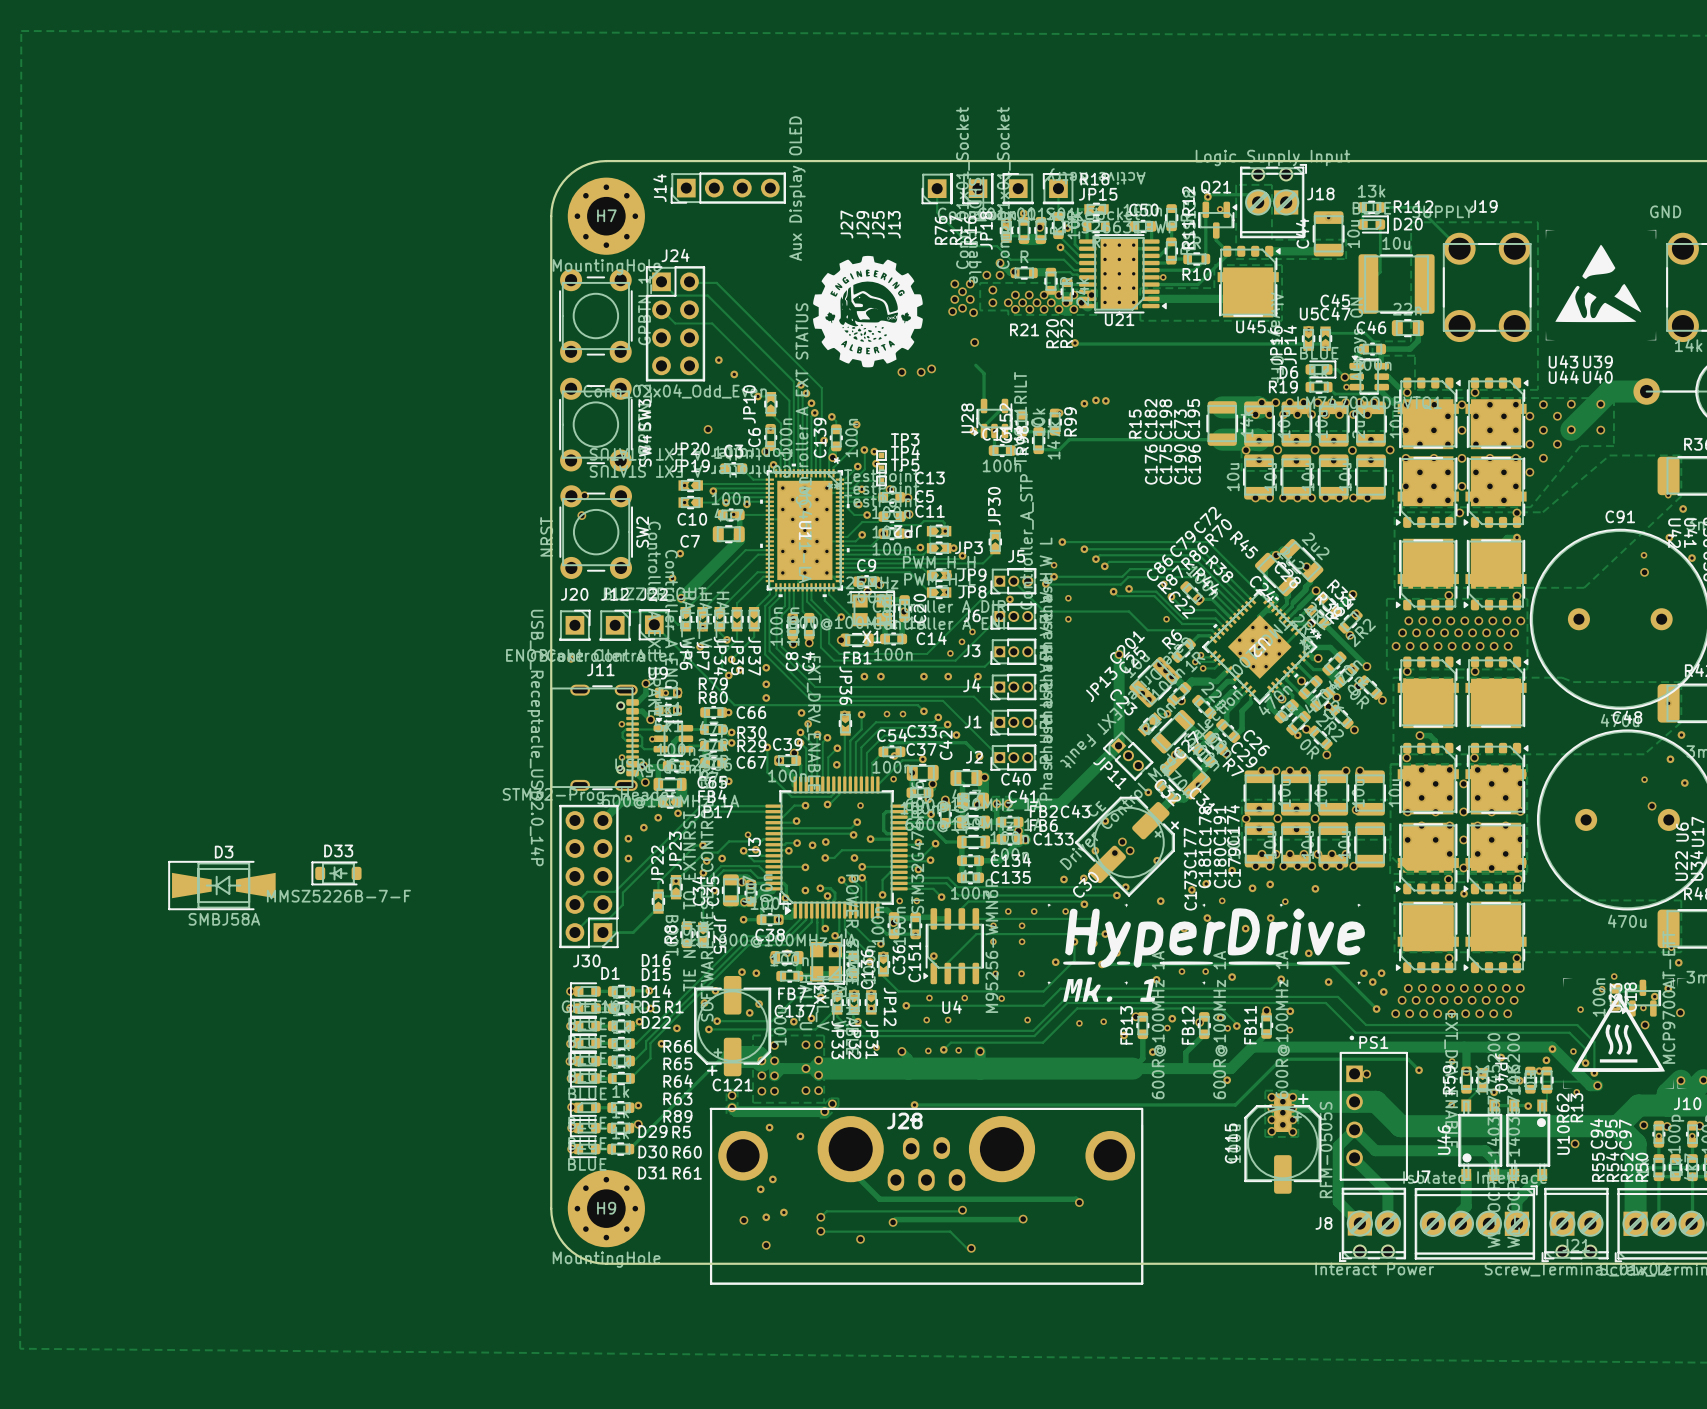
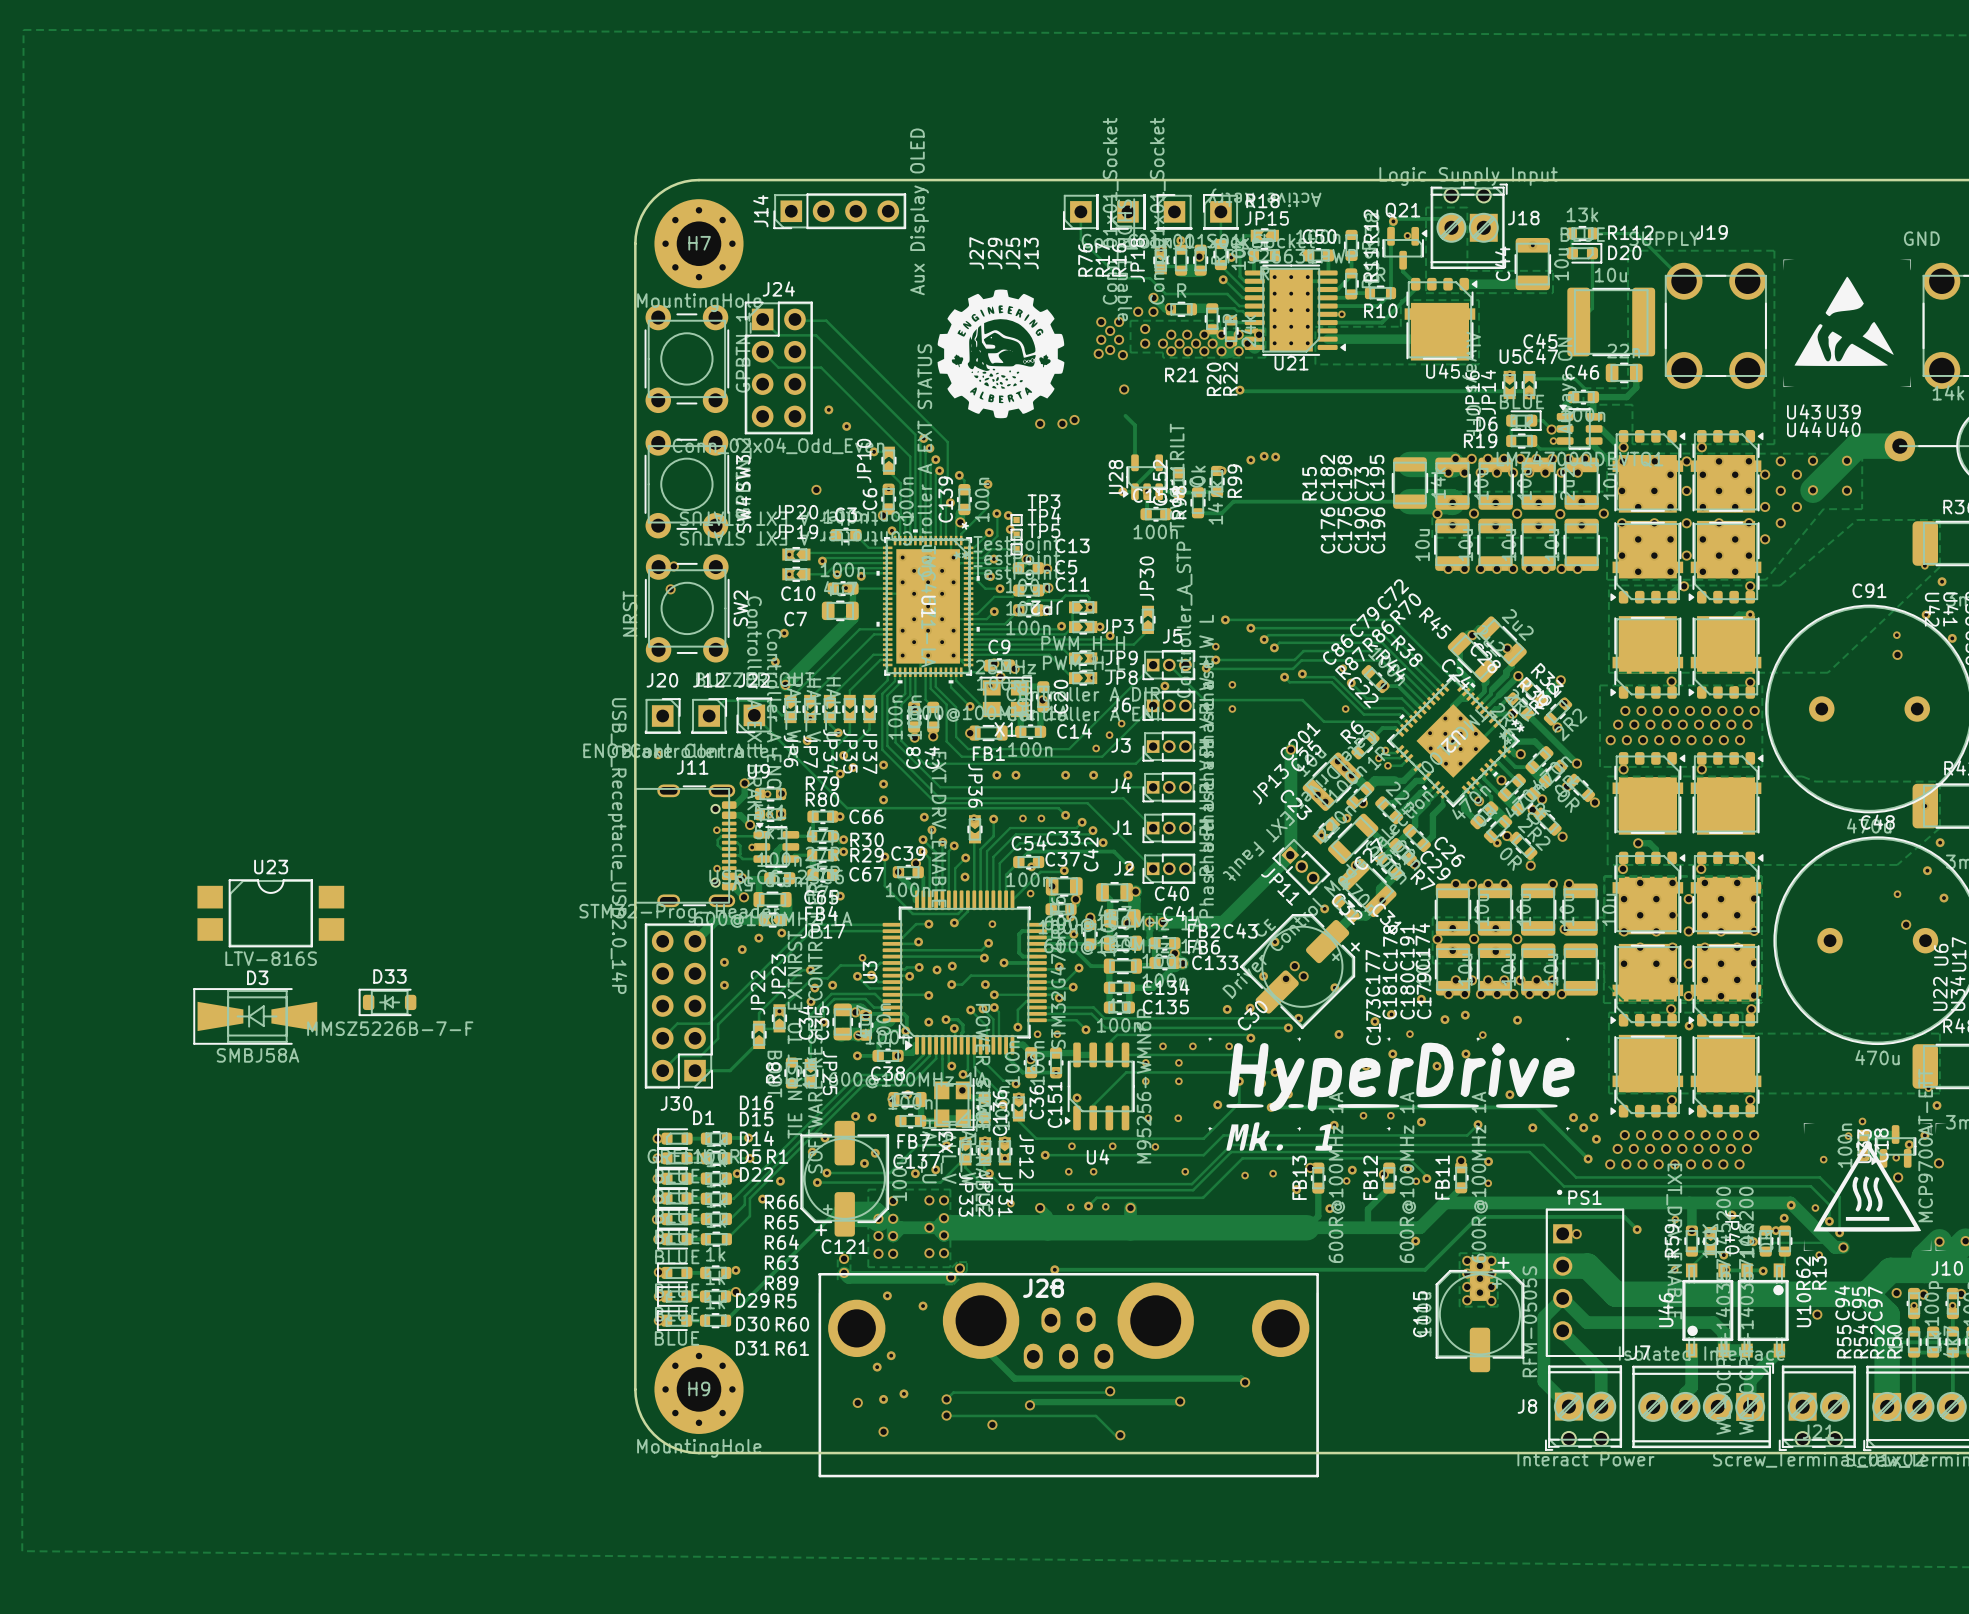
U23: none -> LTV-816S (270, 913)

